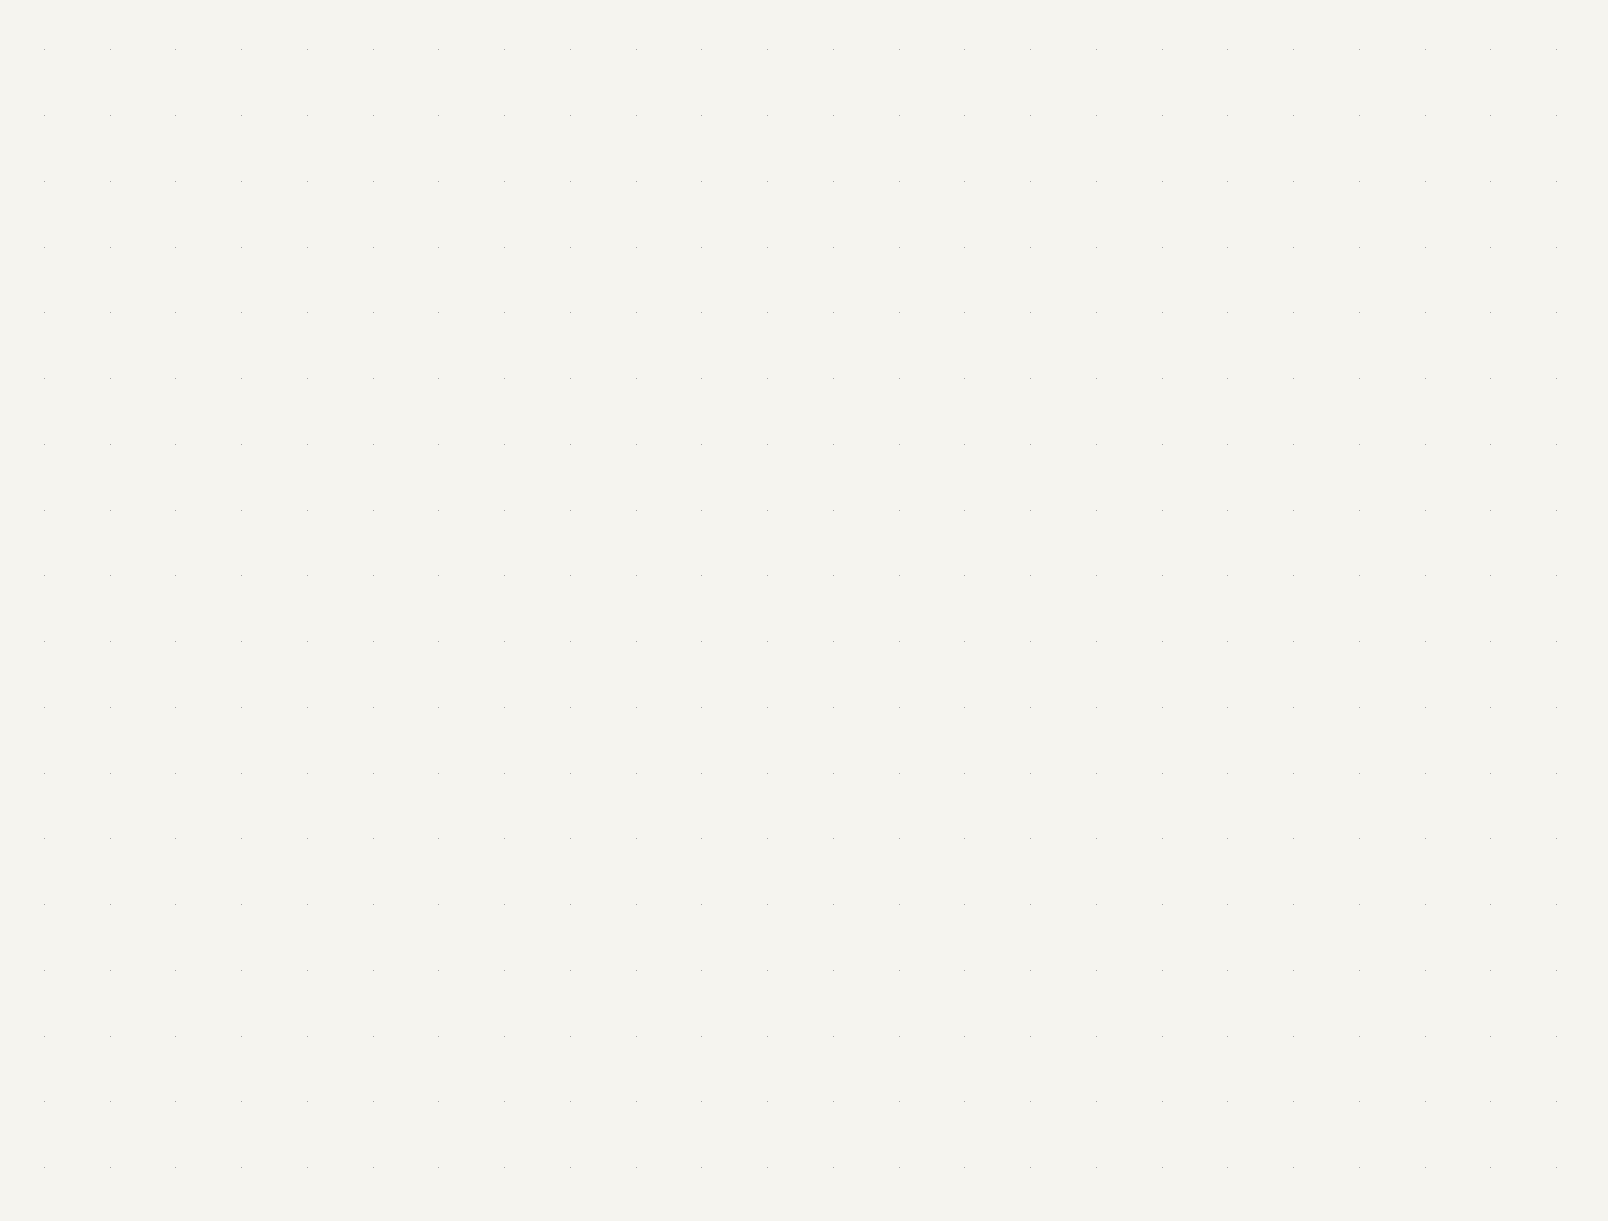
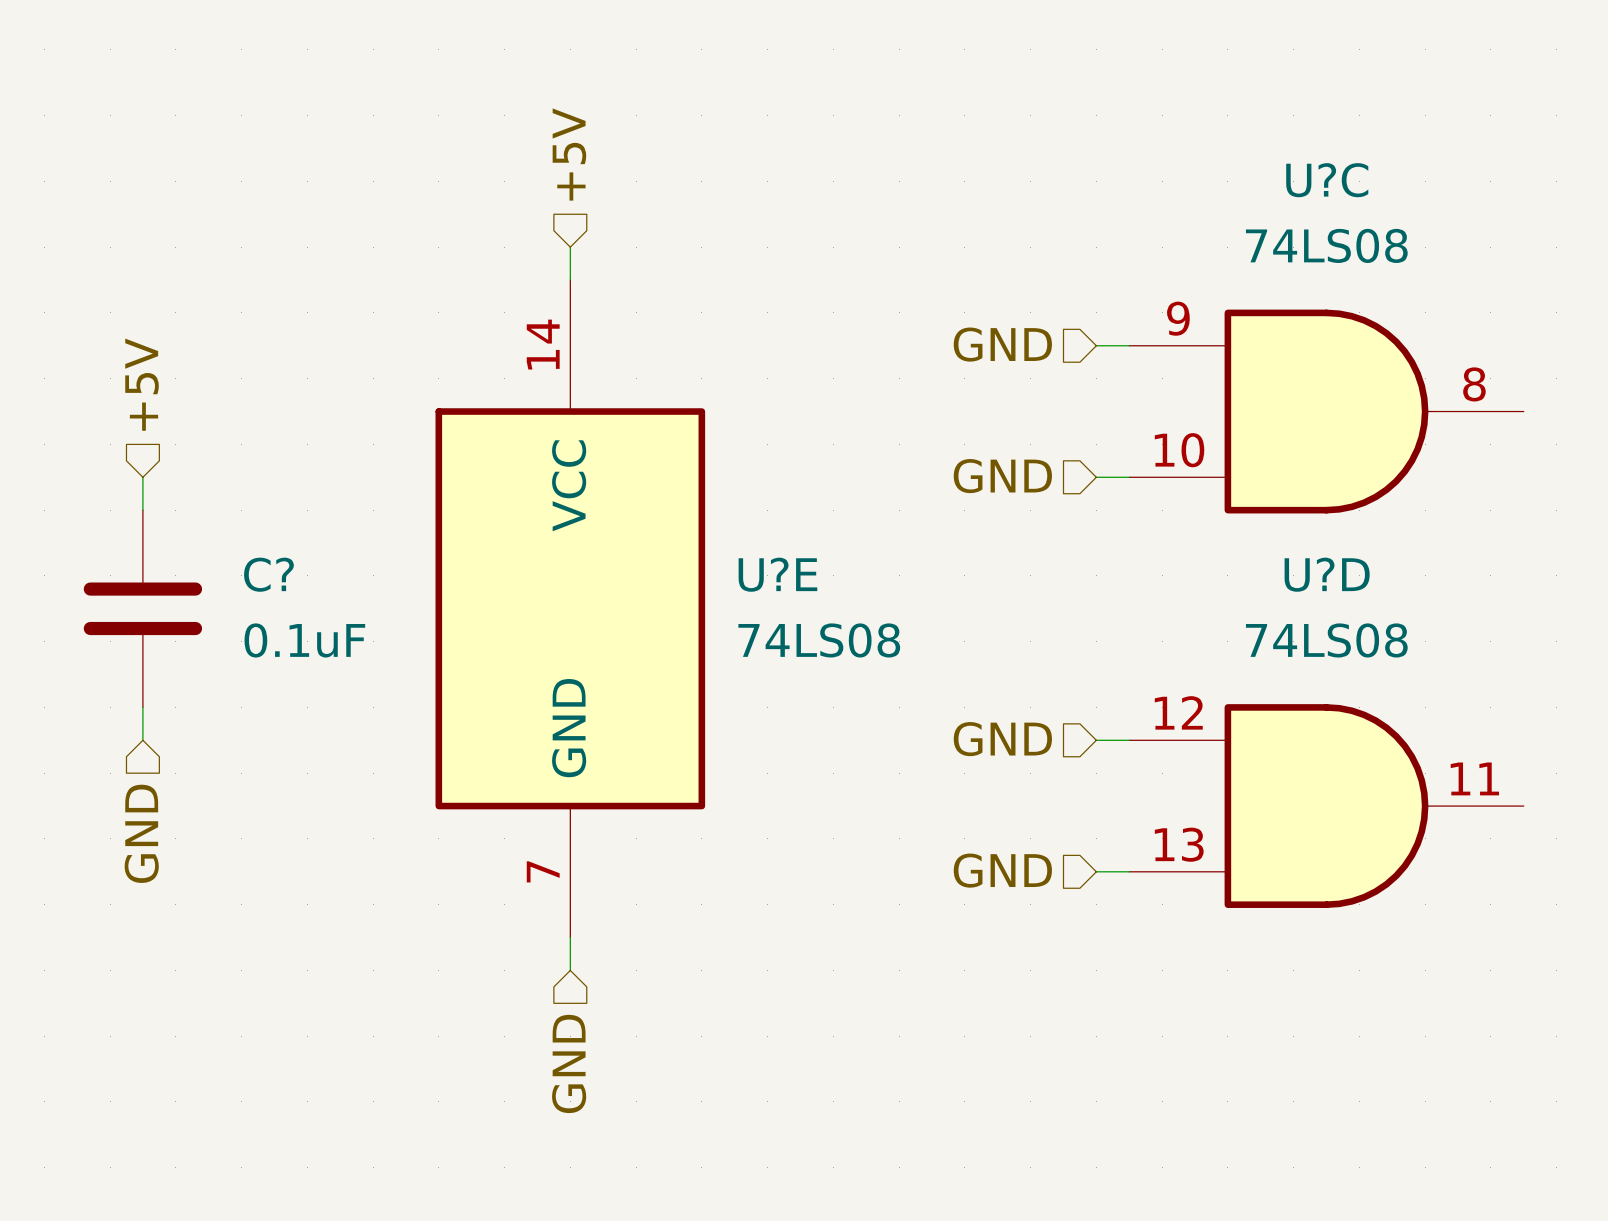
hierarchical label: none -> +5V (569, 154)
wire: none -> (570, 247) (570, 280)
hierarchical label: none -> GND (1002, 344)
wire: none -> (1096, 345) (1129, 345)
hierarchical label: none -> +5V (142, 384)
U?C: none -> 74LS08 (1326, 411)
hierarchical label: none -> GND (1002, 476)
wire: none -> (142, 477) (142, 510)
wire: none -> (1096, 477) (1129, 477)
C?: none -> 0.1uF (142, 608)
U?E: none -> 74LS08 (570, 608)
wire: none -> (142, 707) (142, 740)
hierarchical label: none -> GND (1002, 739)
wire: none -> (1096, 740) (1129, 740)
U?D: none -> 74LS08 (1326, 806)
hierarchical label: none -> GND (141, 833)
hierarchical label: none -> GND (1002, 870)
wire: none -> (1096, 871) (1129, 871)
wire: none -> (570, 937) (570, 970)
hierarchical label: none -> GND (569, 1063)

